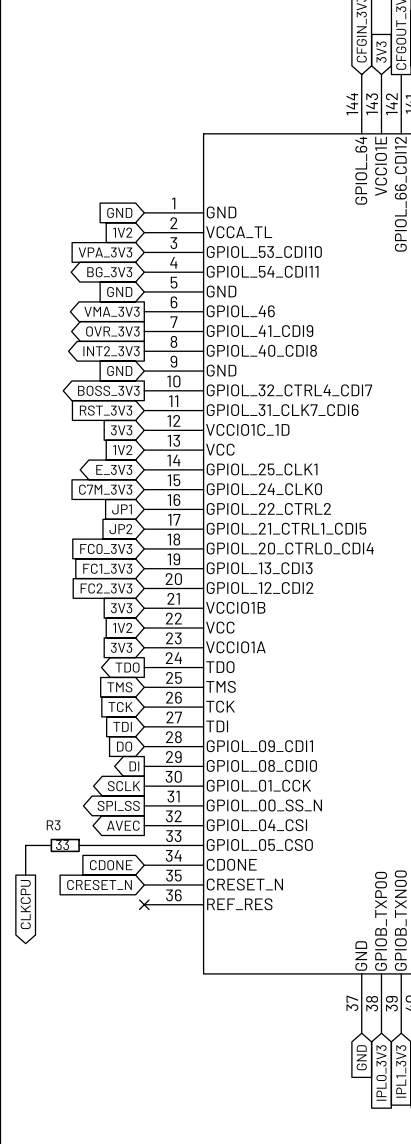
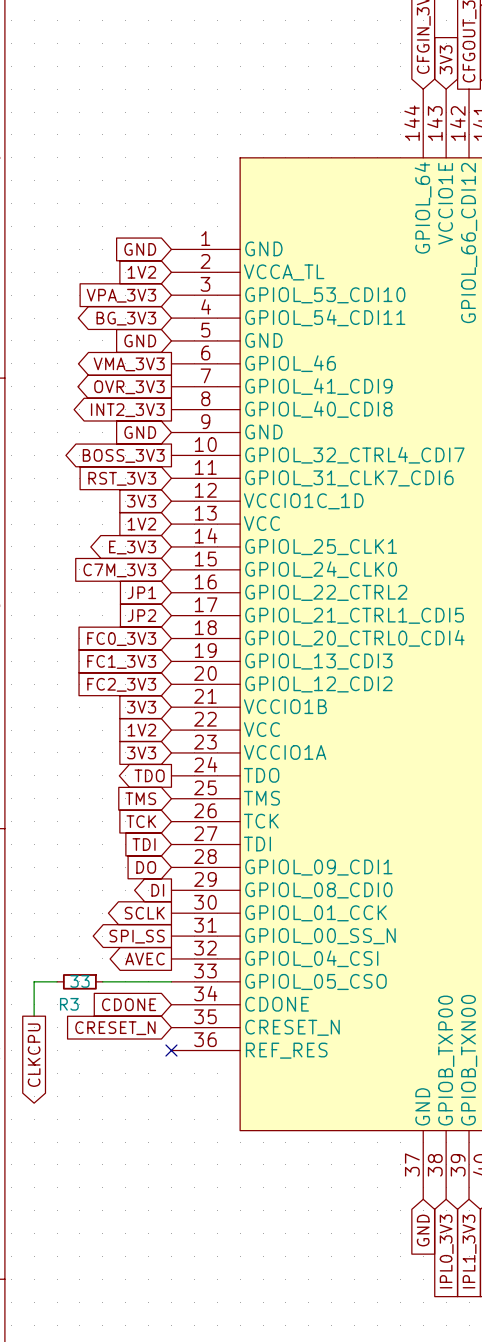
R3 name position: R3 (53, 825) -> R3 (69, 1004)

